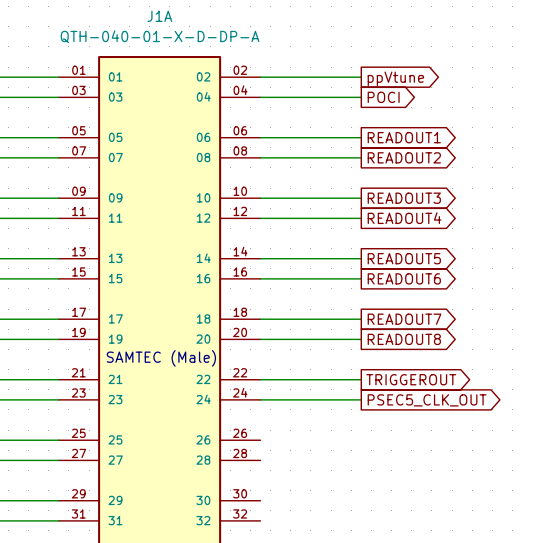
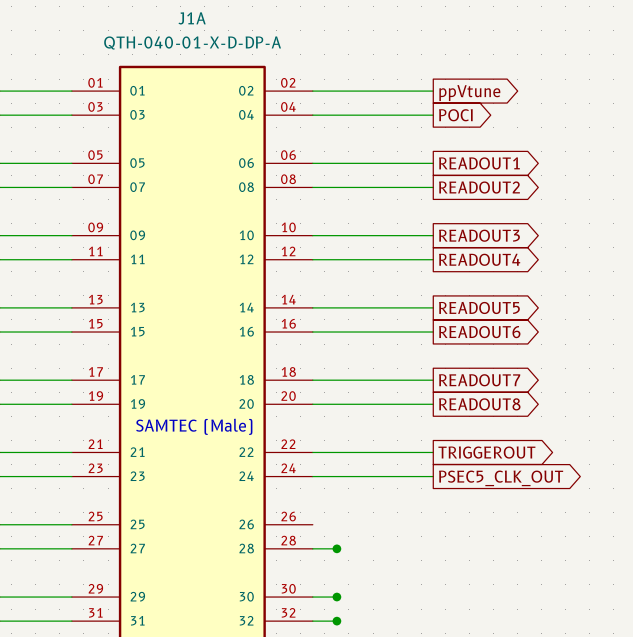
wire: none -> (312, 548) (336, 548)
junction: none -> (336, 548)
wire: none -> (312, 597) (336, 597)
junction: none -> (336, 597)
wire: none -> (312, 621) (336, 621)
junction: none -> (336, 621)

